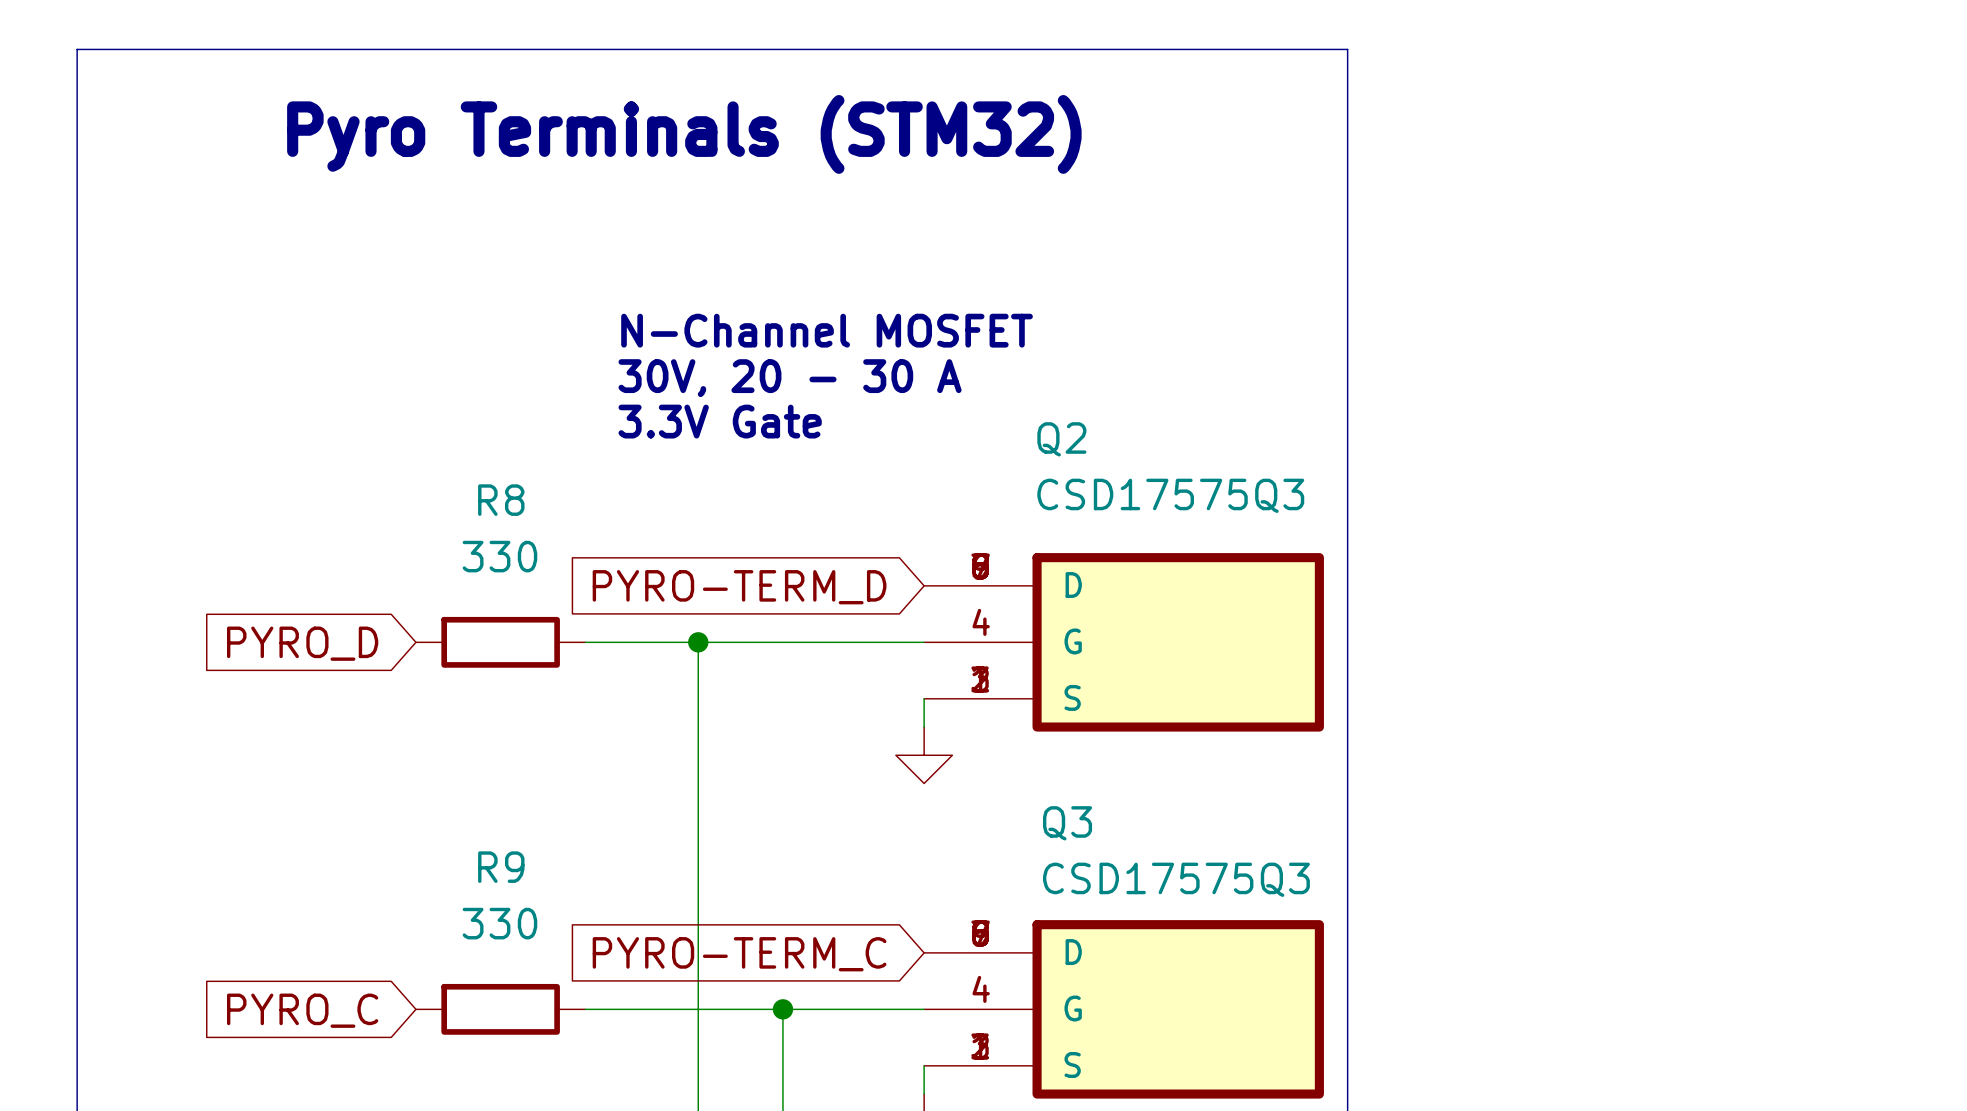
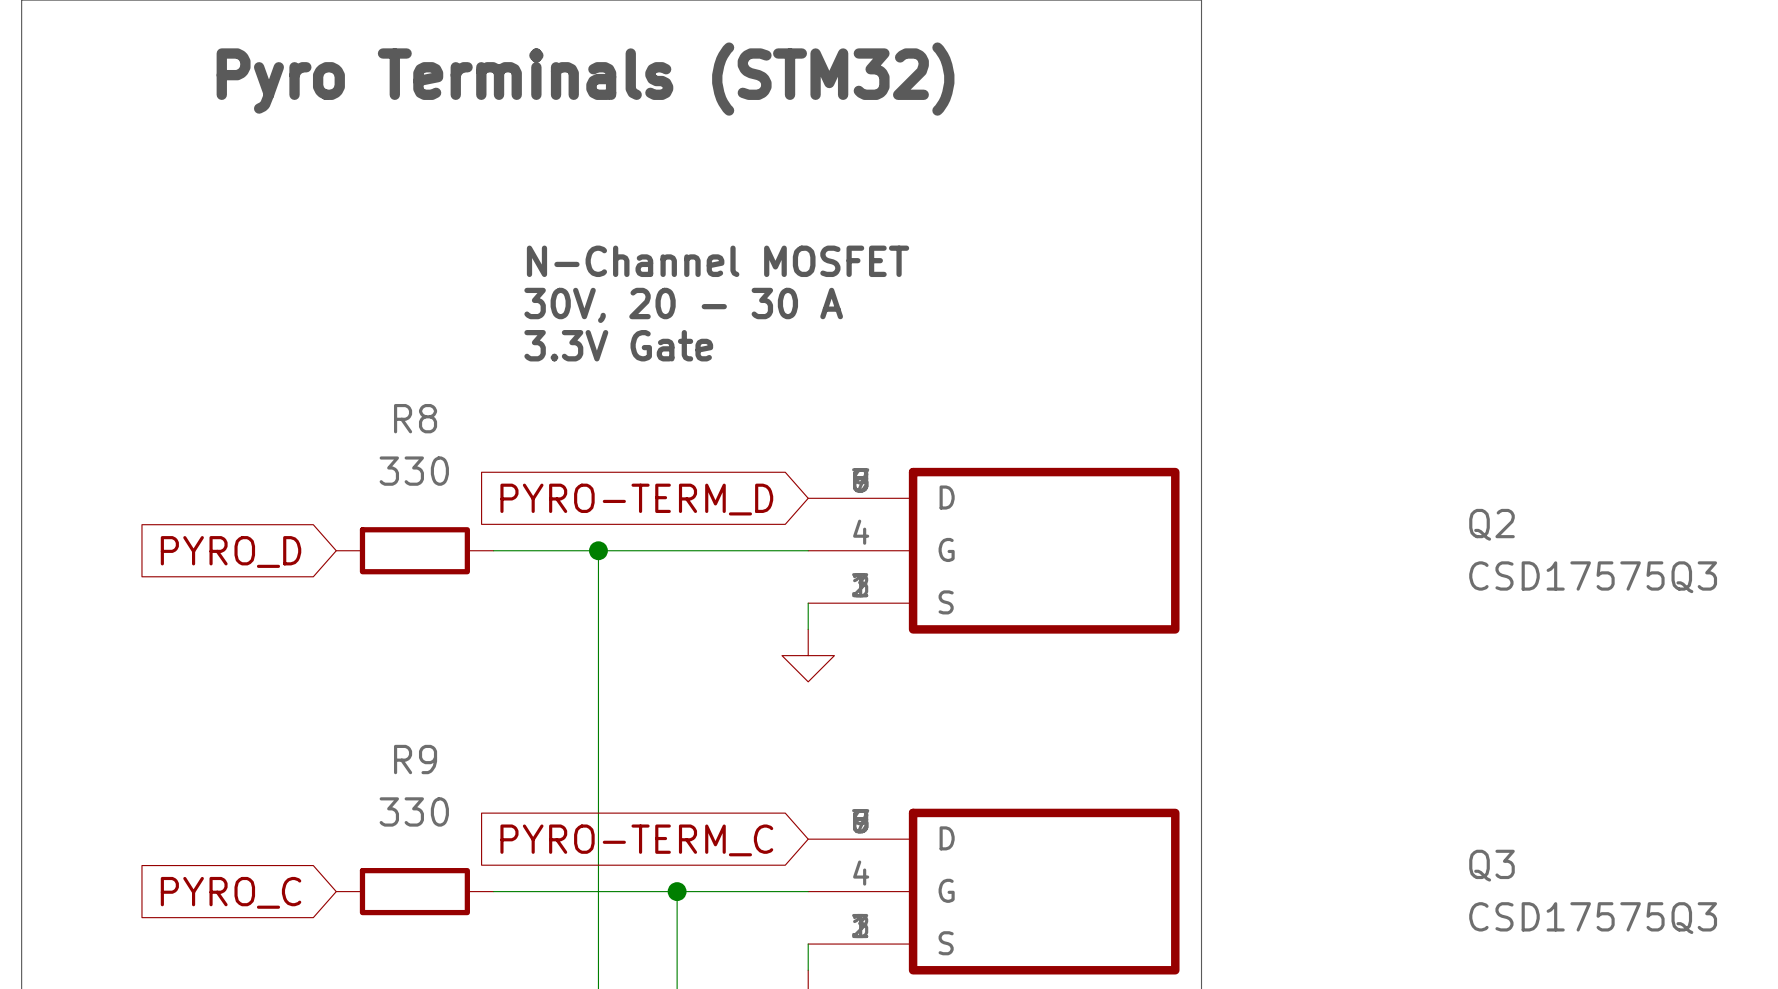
Q2 name position: Q2 (1061, 439) -> Q2 (1491, 524)
Q2 value position: CSD17575Q3 (1170, 495) -> CSD17575Q3 (1593, 577)
Q3 name position: Q3 (1067, 823) -> Q3 (1491, 865)
Q3 value position: CSD17575Q3 (1176, 879) -> CSD17575Q3 (1593, 918)

